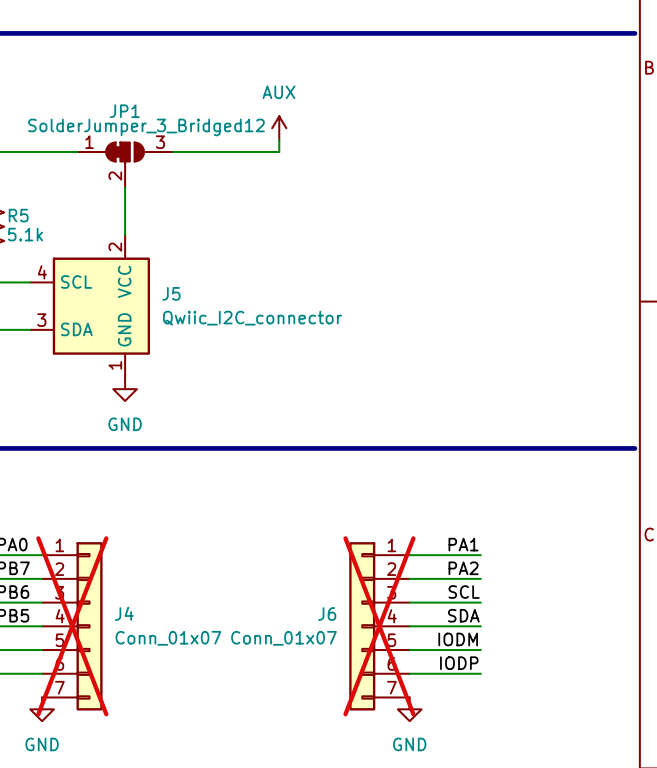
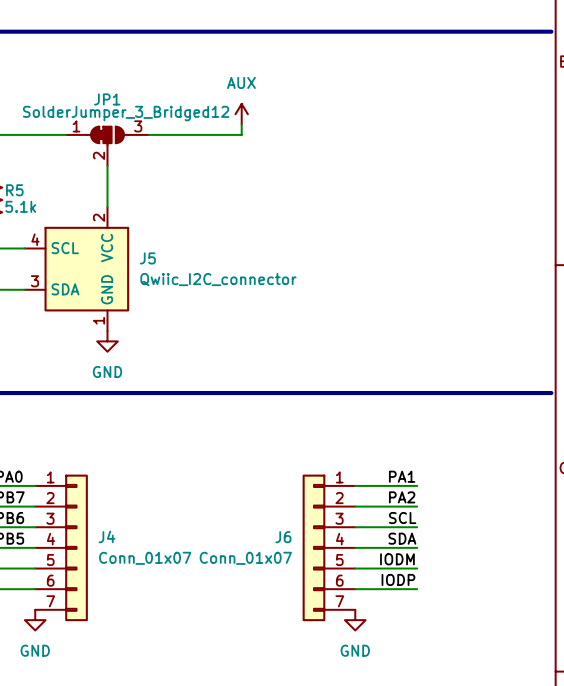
J4 do-not-place cross: (72, 626) -> none
J6 do-not-place cross: (379, 626) -> none

